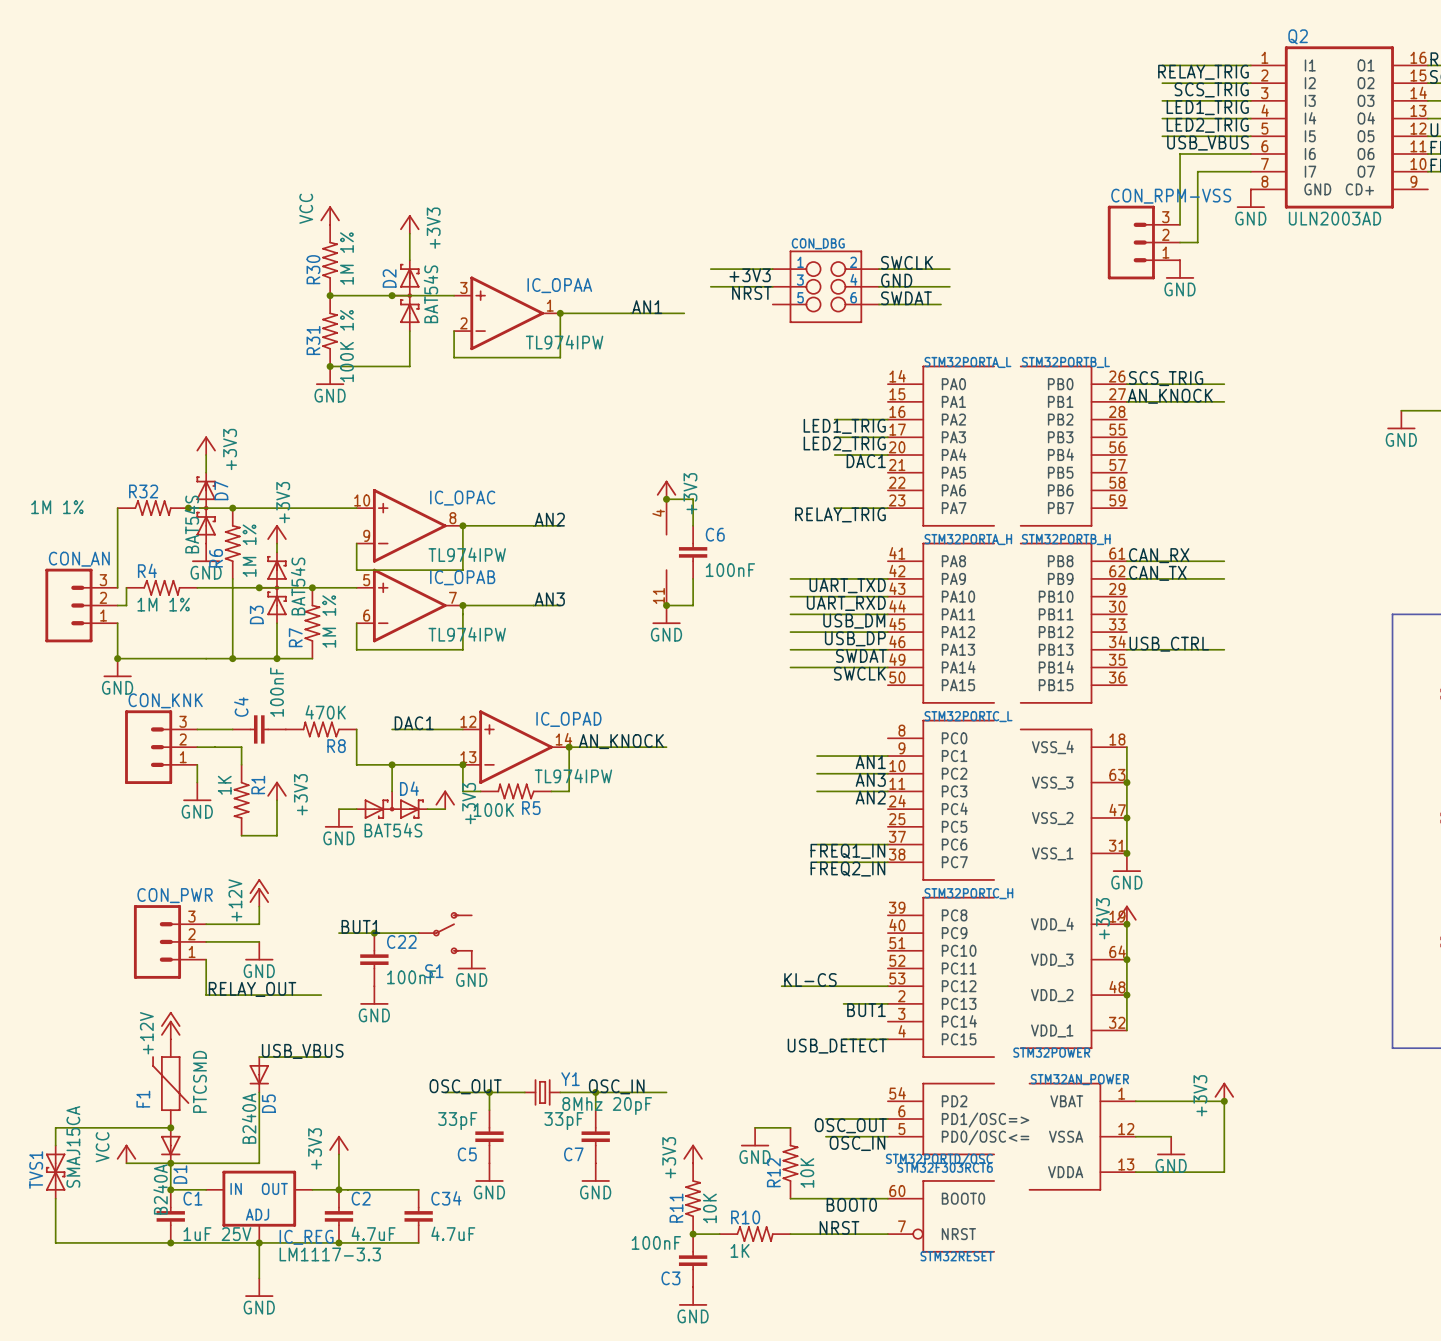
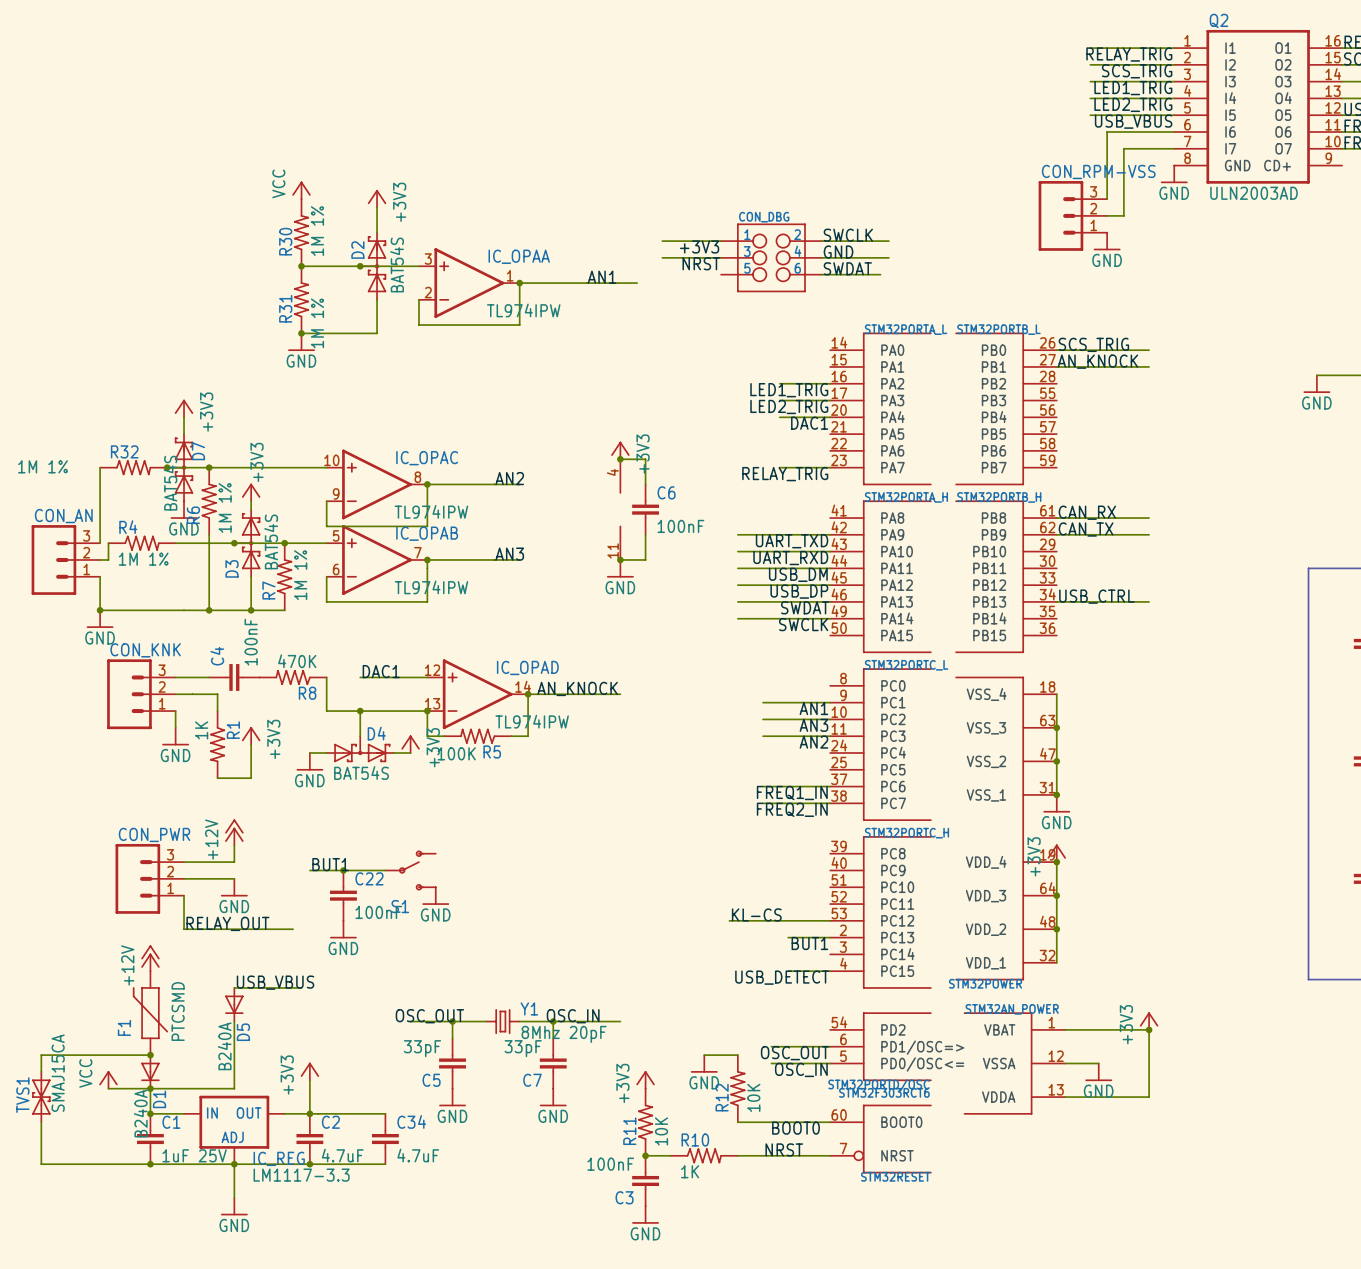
R31 value: 100K 1% (346, 346) -> 1M 1% (317, 323)

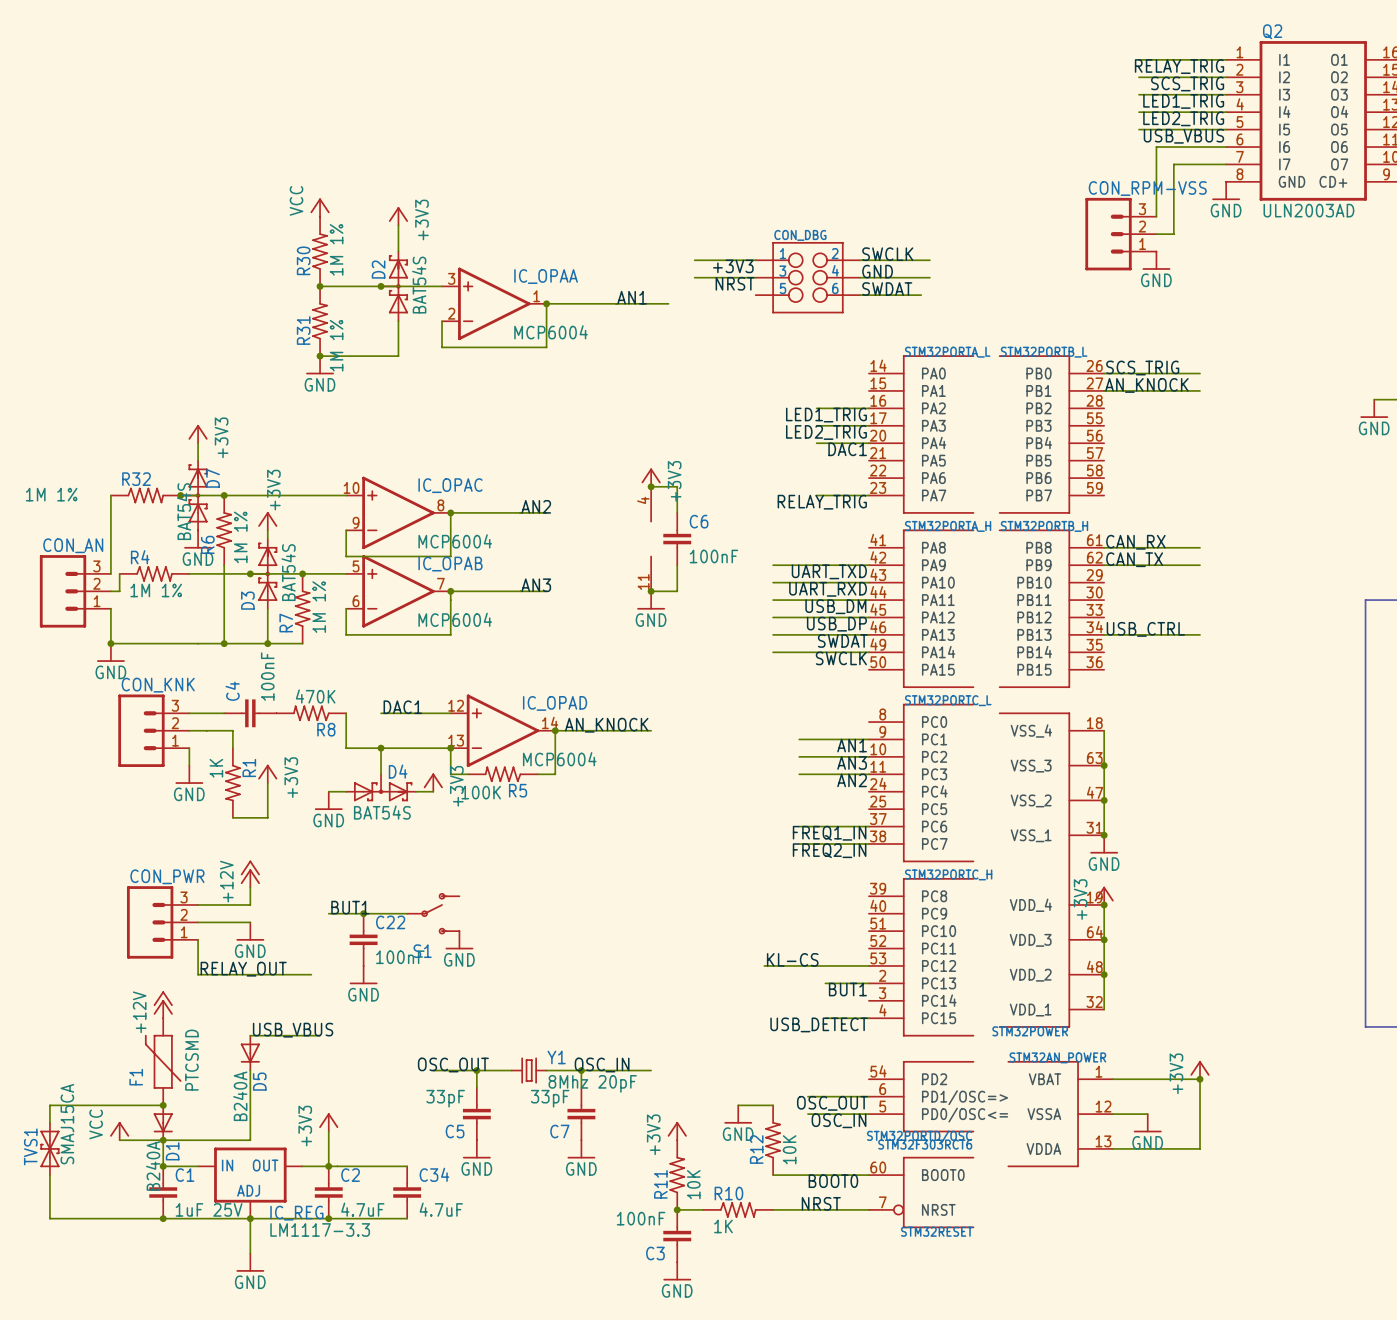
IC_OPAA value: TL974IPW (523, 310) -> MCP6004 (551, 332)
IC_OPAC value: TL974IPW (431, 511) -> MCP6004 (455, 541)
IC_OPAB value: TL974IPW (431, 587) -> MCP6004 (455, 619)
IC_OPAD value: TL974IPW (532, 721) -> MCP6004 (559, 759)

